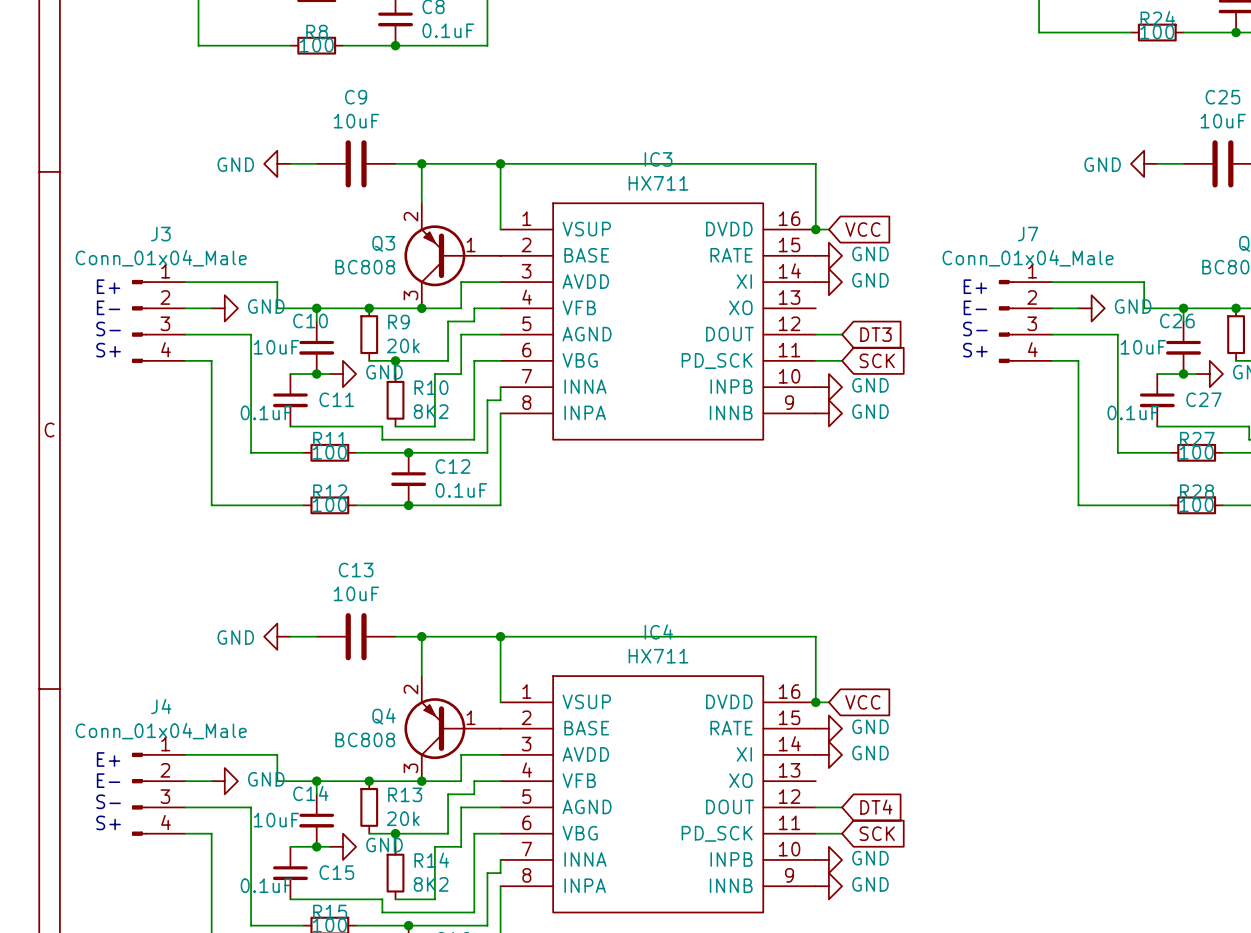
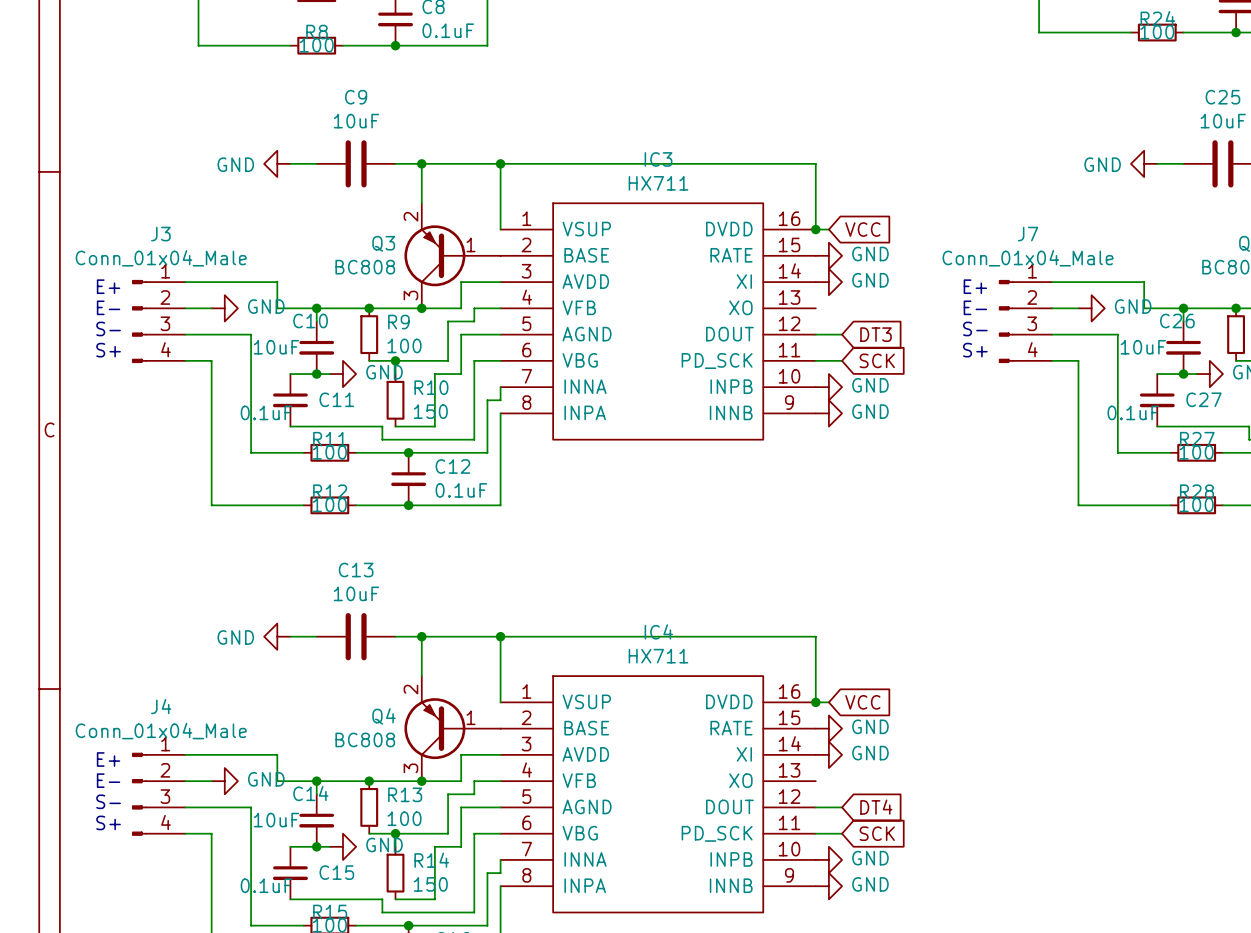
R9 value: 20k (403, 345) -> 100 (404, 345)
R10 value: 8K2 (431, 411) -> 150 (430, 411)
R13 value: 20k (403, 818) -> 100 (404, 818)
R14 value: 8K2 (431, 884) -> 150 (430, 884)

